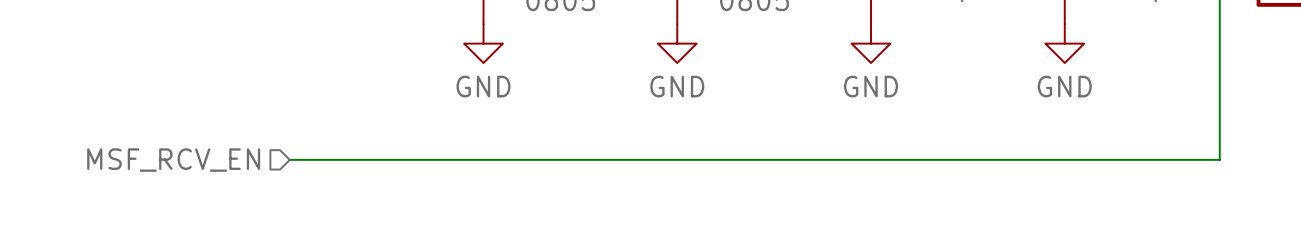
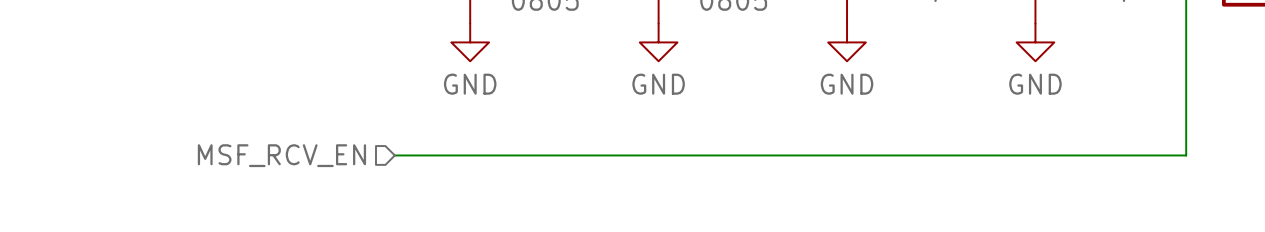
wire: (289, 159) (406, 159) -> none
hierarchical label position: MSF_RCV_EN (173, 160) -> MSF_RCV_EN (281, 155)

